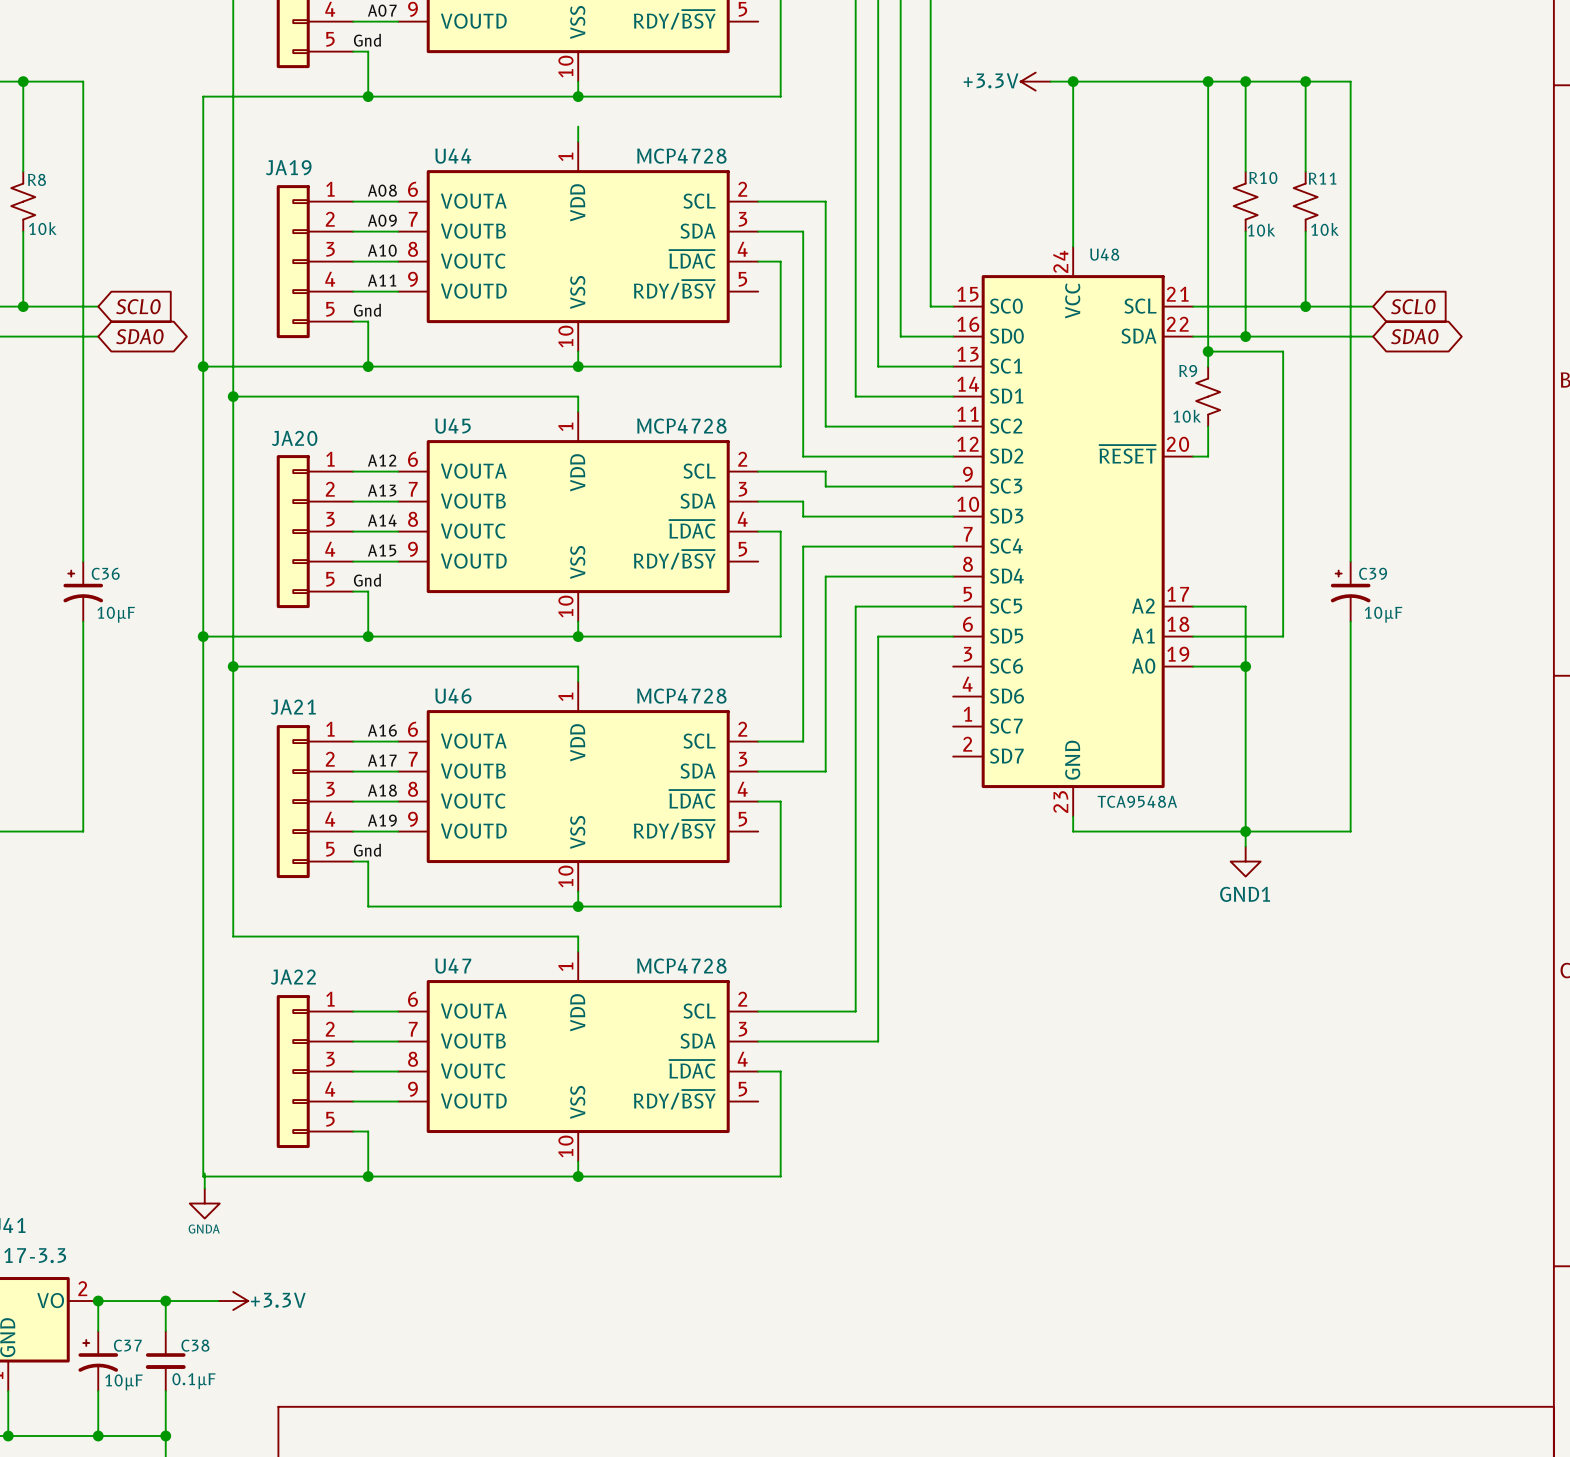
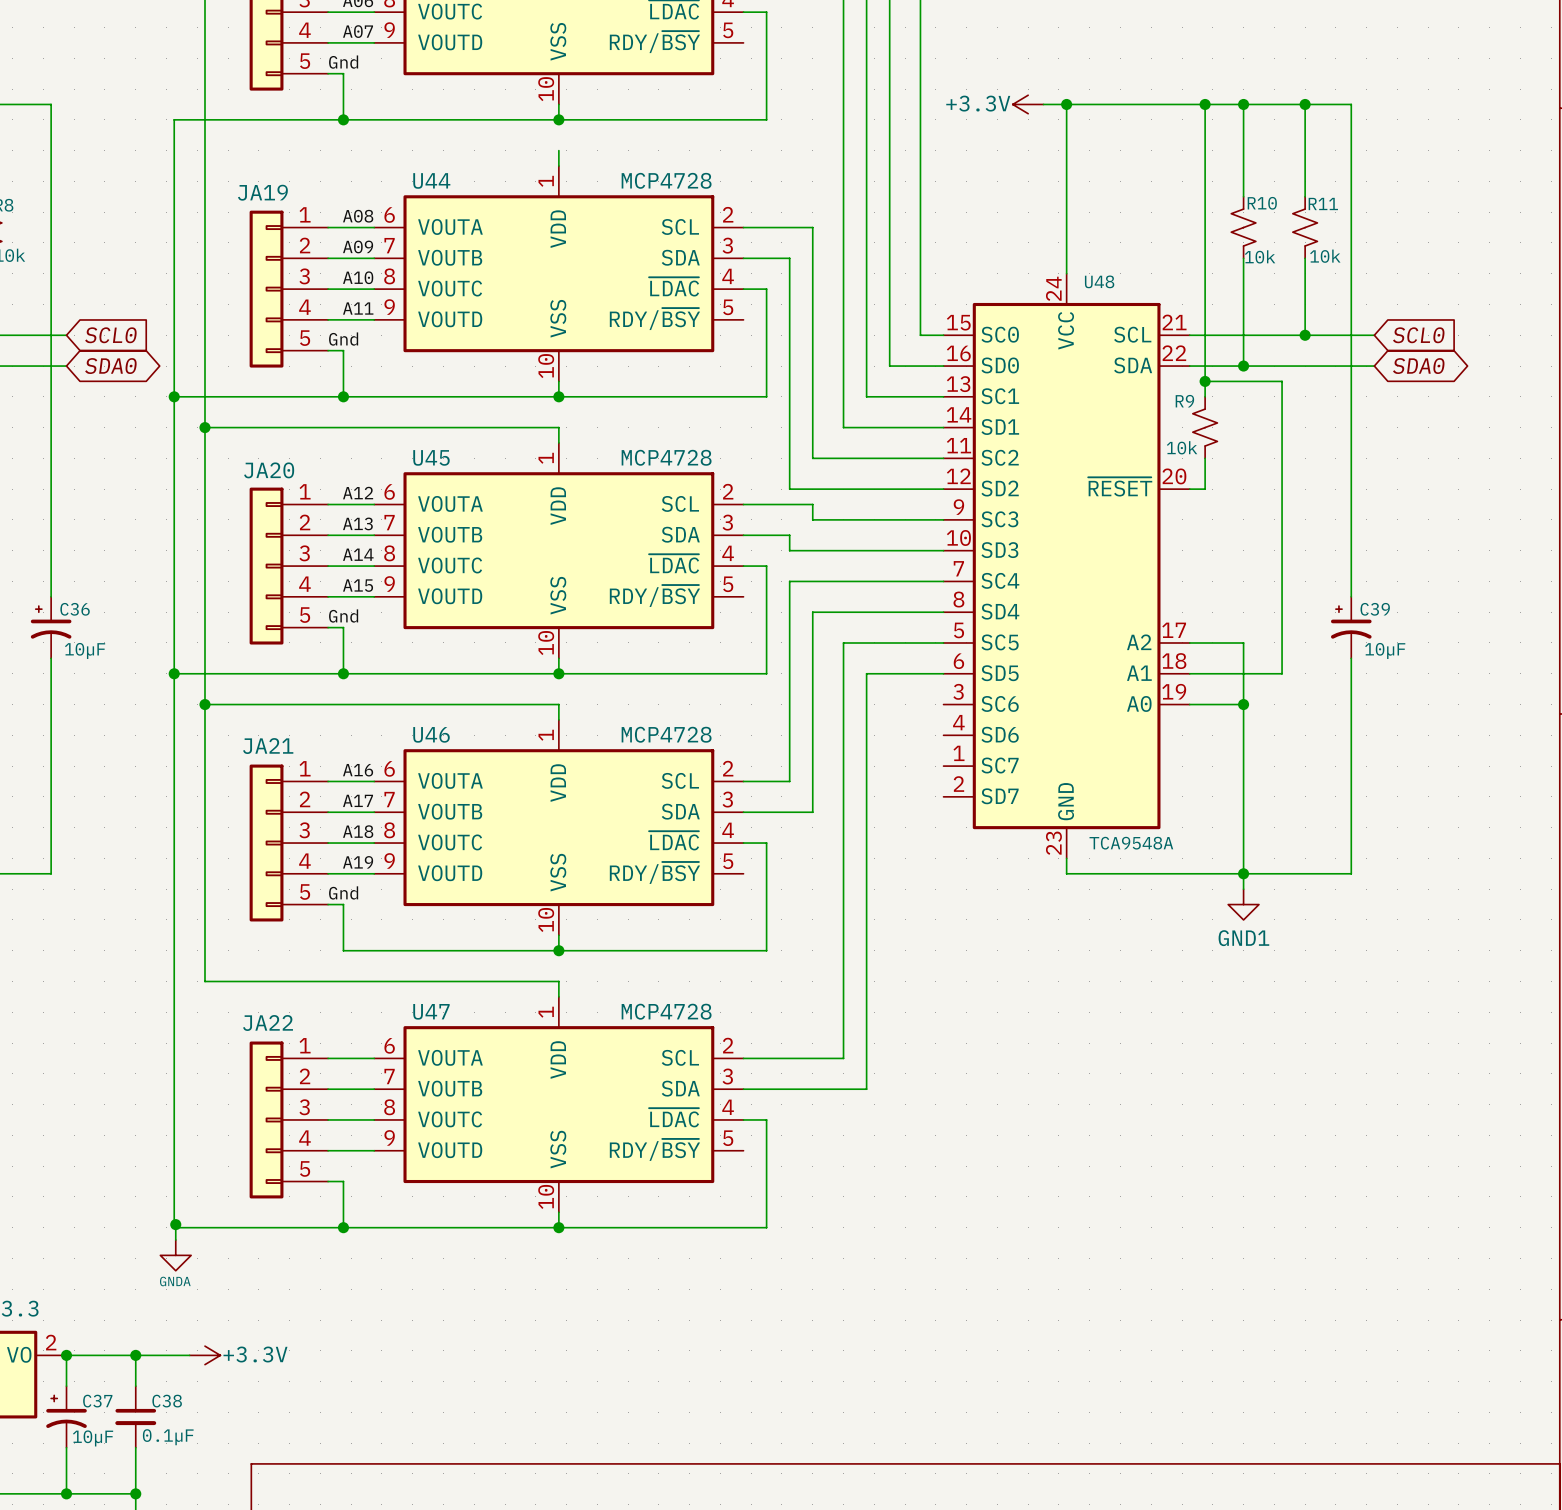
junction: none -> (175, 1224)

